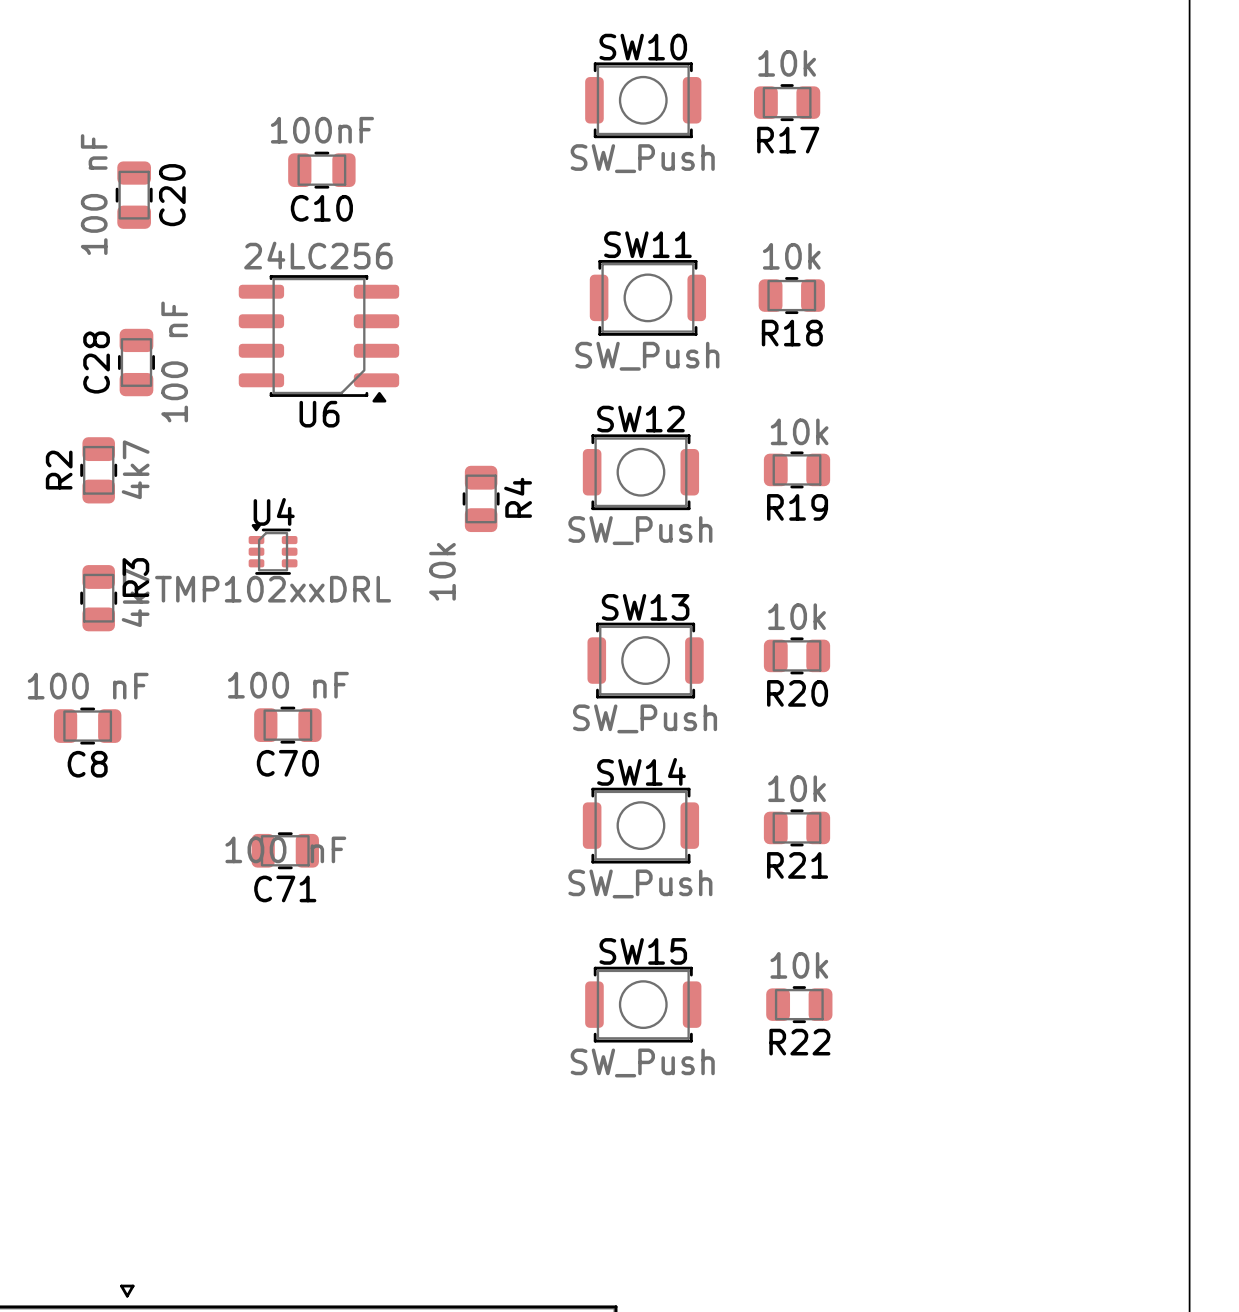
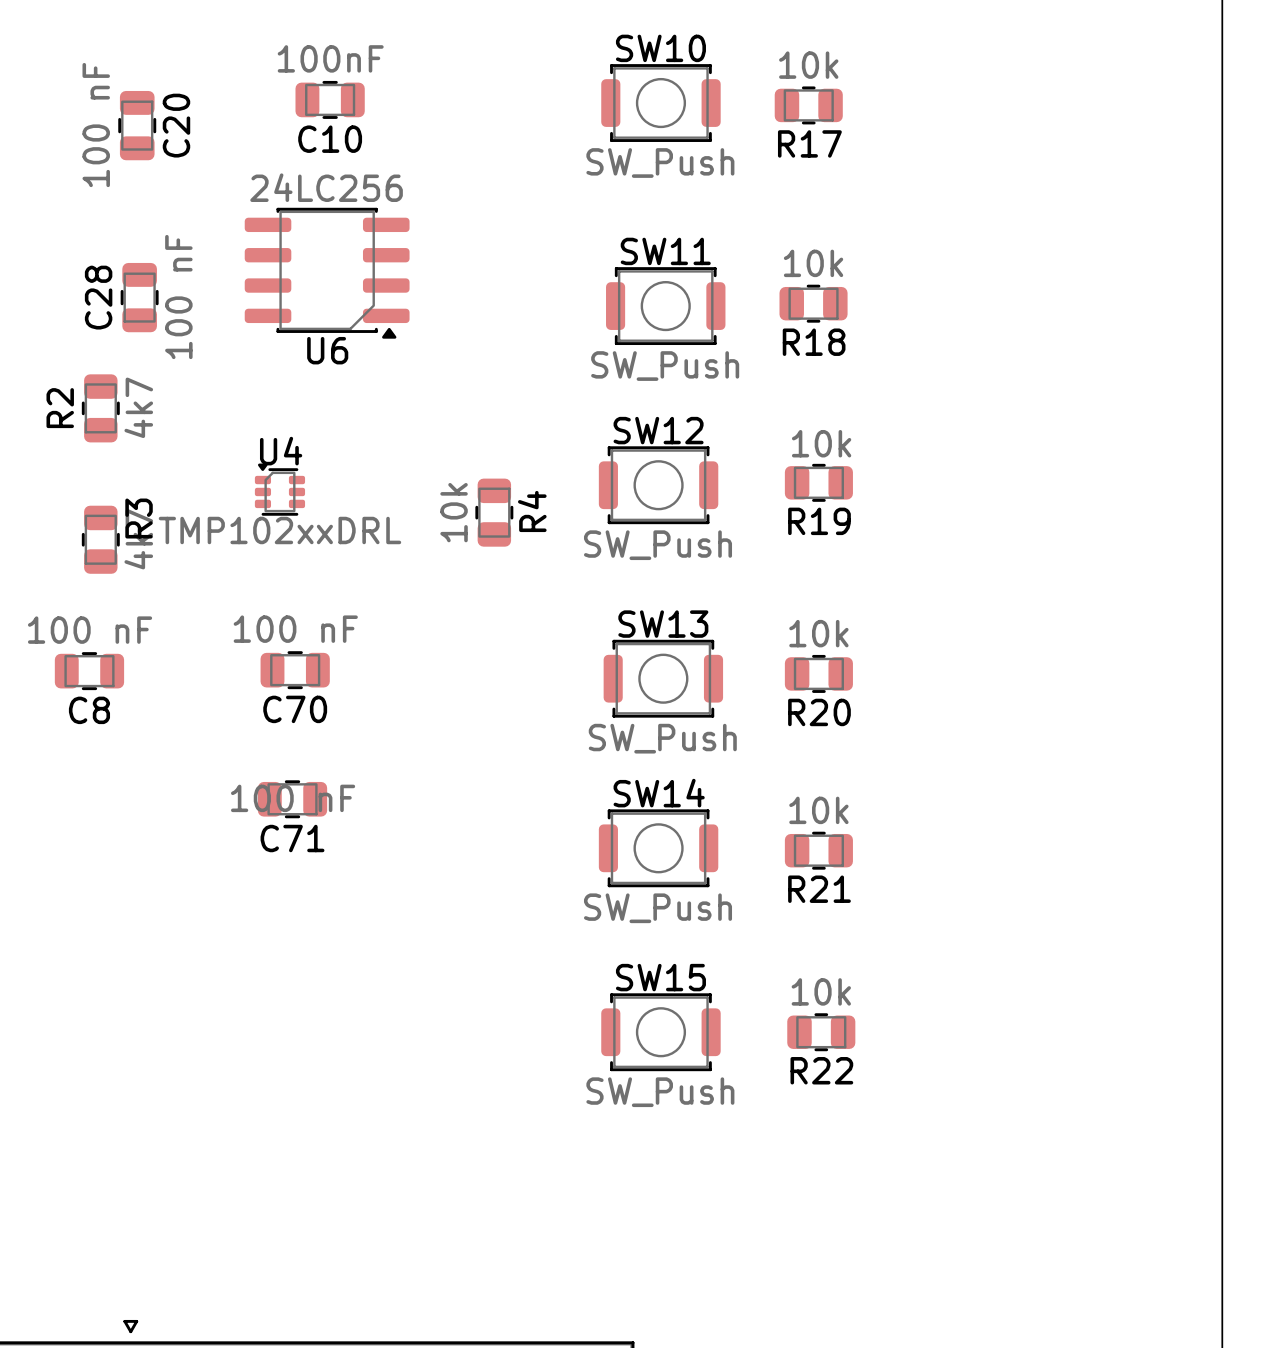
C10 position: (321, 170) -> (330, 99)
C20 position: (134, 195) -> (137, 125)
U6 position: (318, 338) -> (327, 273)
C28 position: (136, 362) -> (139, 297)
R2 position: (98, 470) -> (100, 408)
U4 position: (273, 549) -> (279, 489)
R4 value position: 10k (442, 571) -> 10k (454, 512)
R3 position: (98, 598) -> (100, 539)
C70 position: (287, 725) -> (295, 670)
C8 position: (87, 726) -> (89, 671)
C71 position: (285, 850) -> (292, 799)

